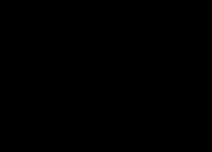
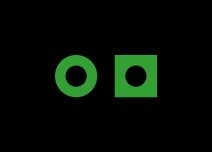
part: none -> (106, 76)

